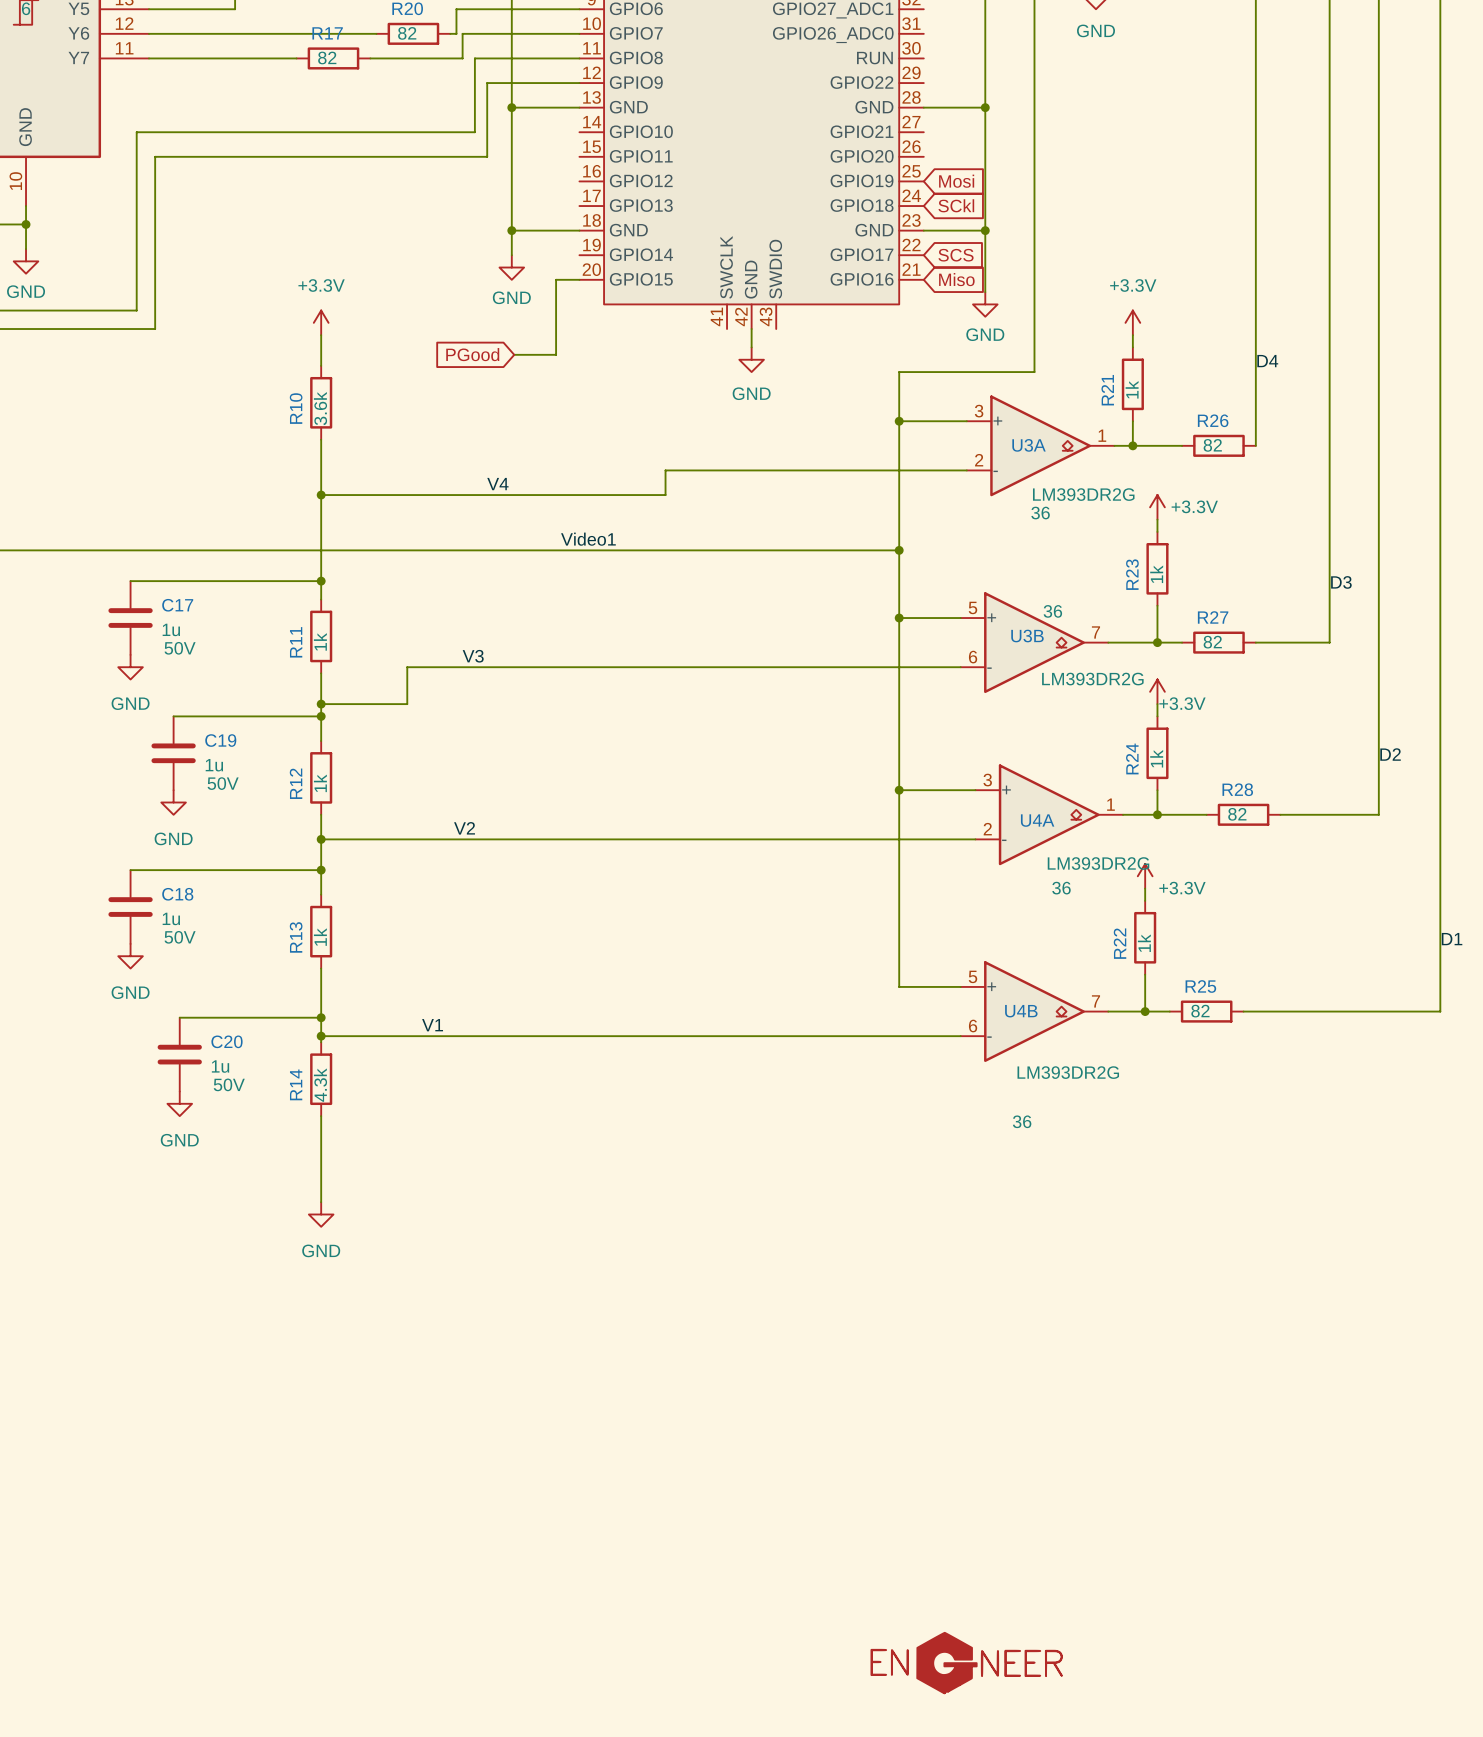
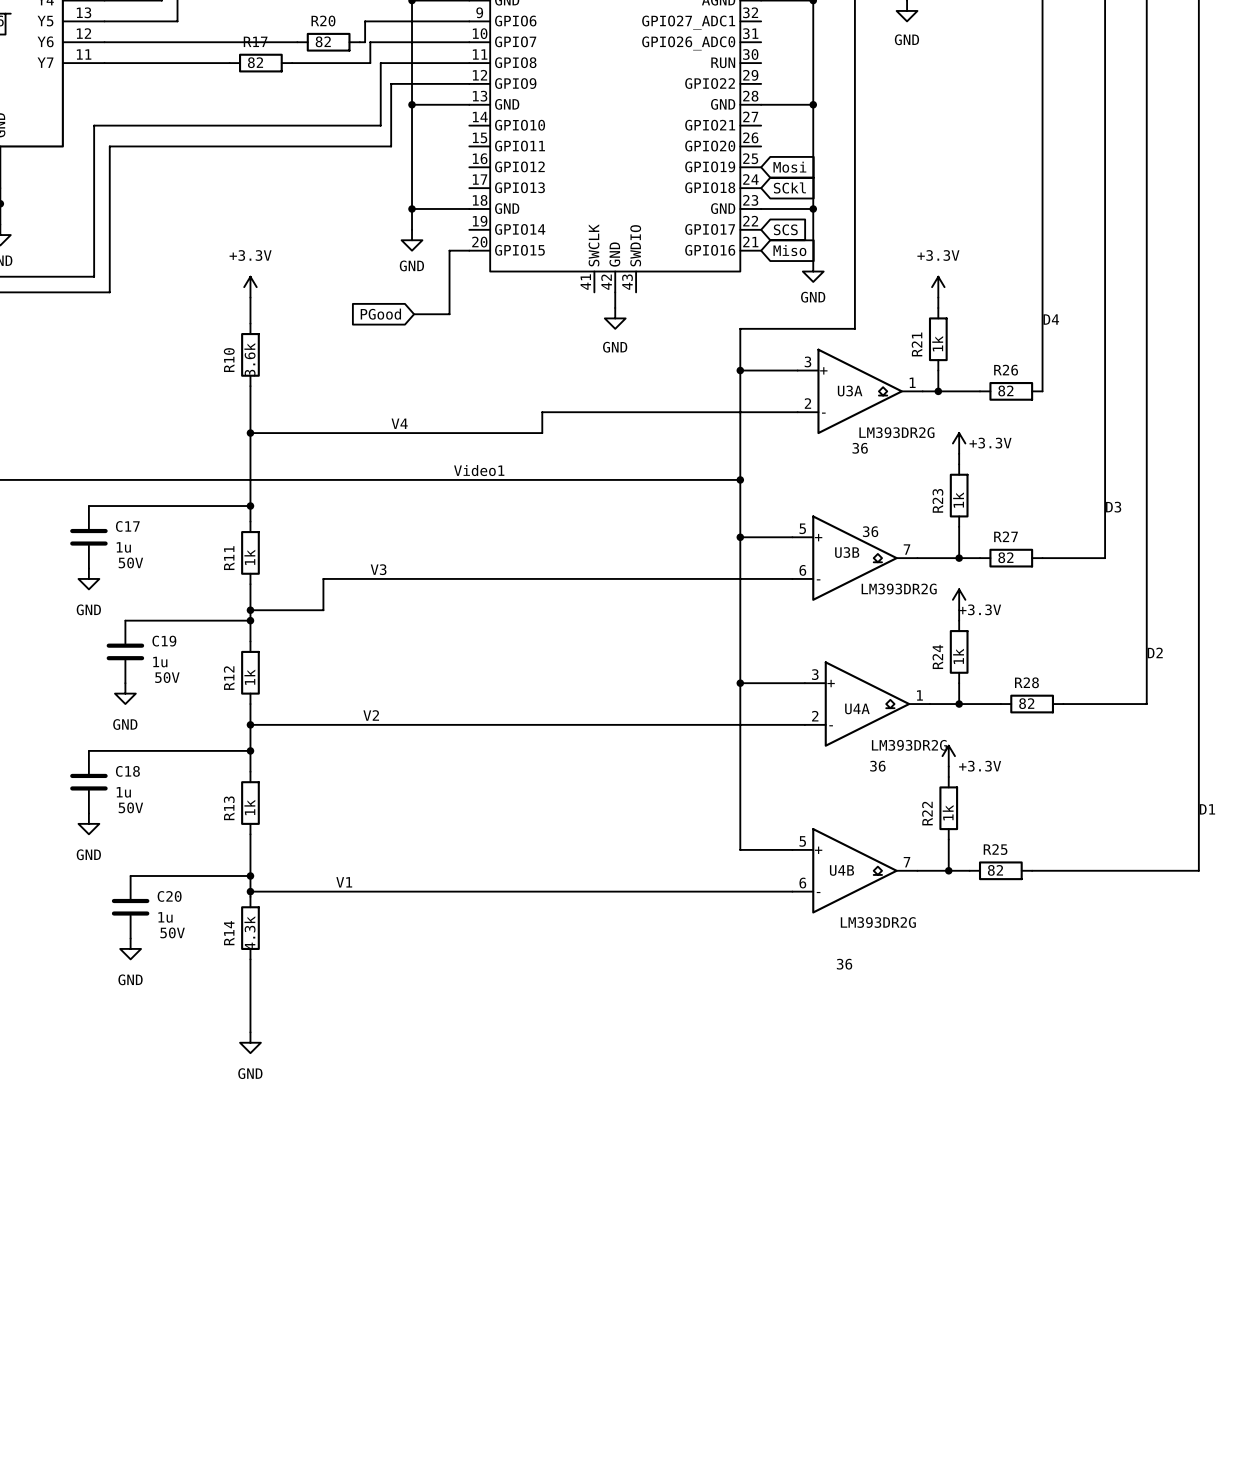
part: (966, 1663) -> none

